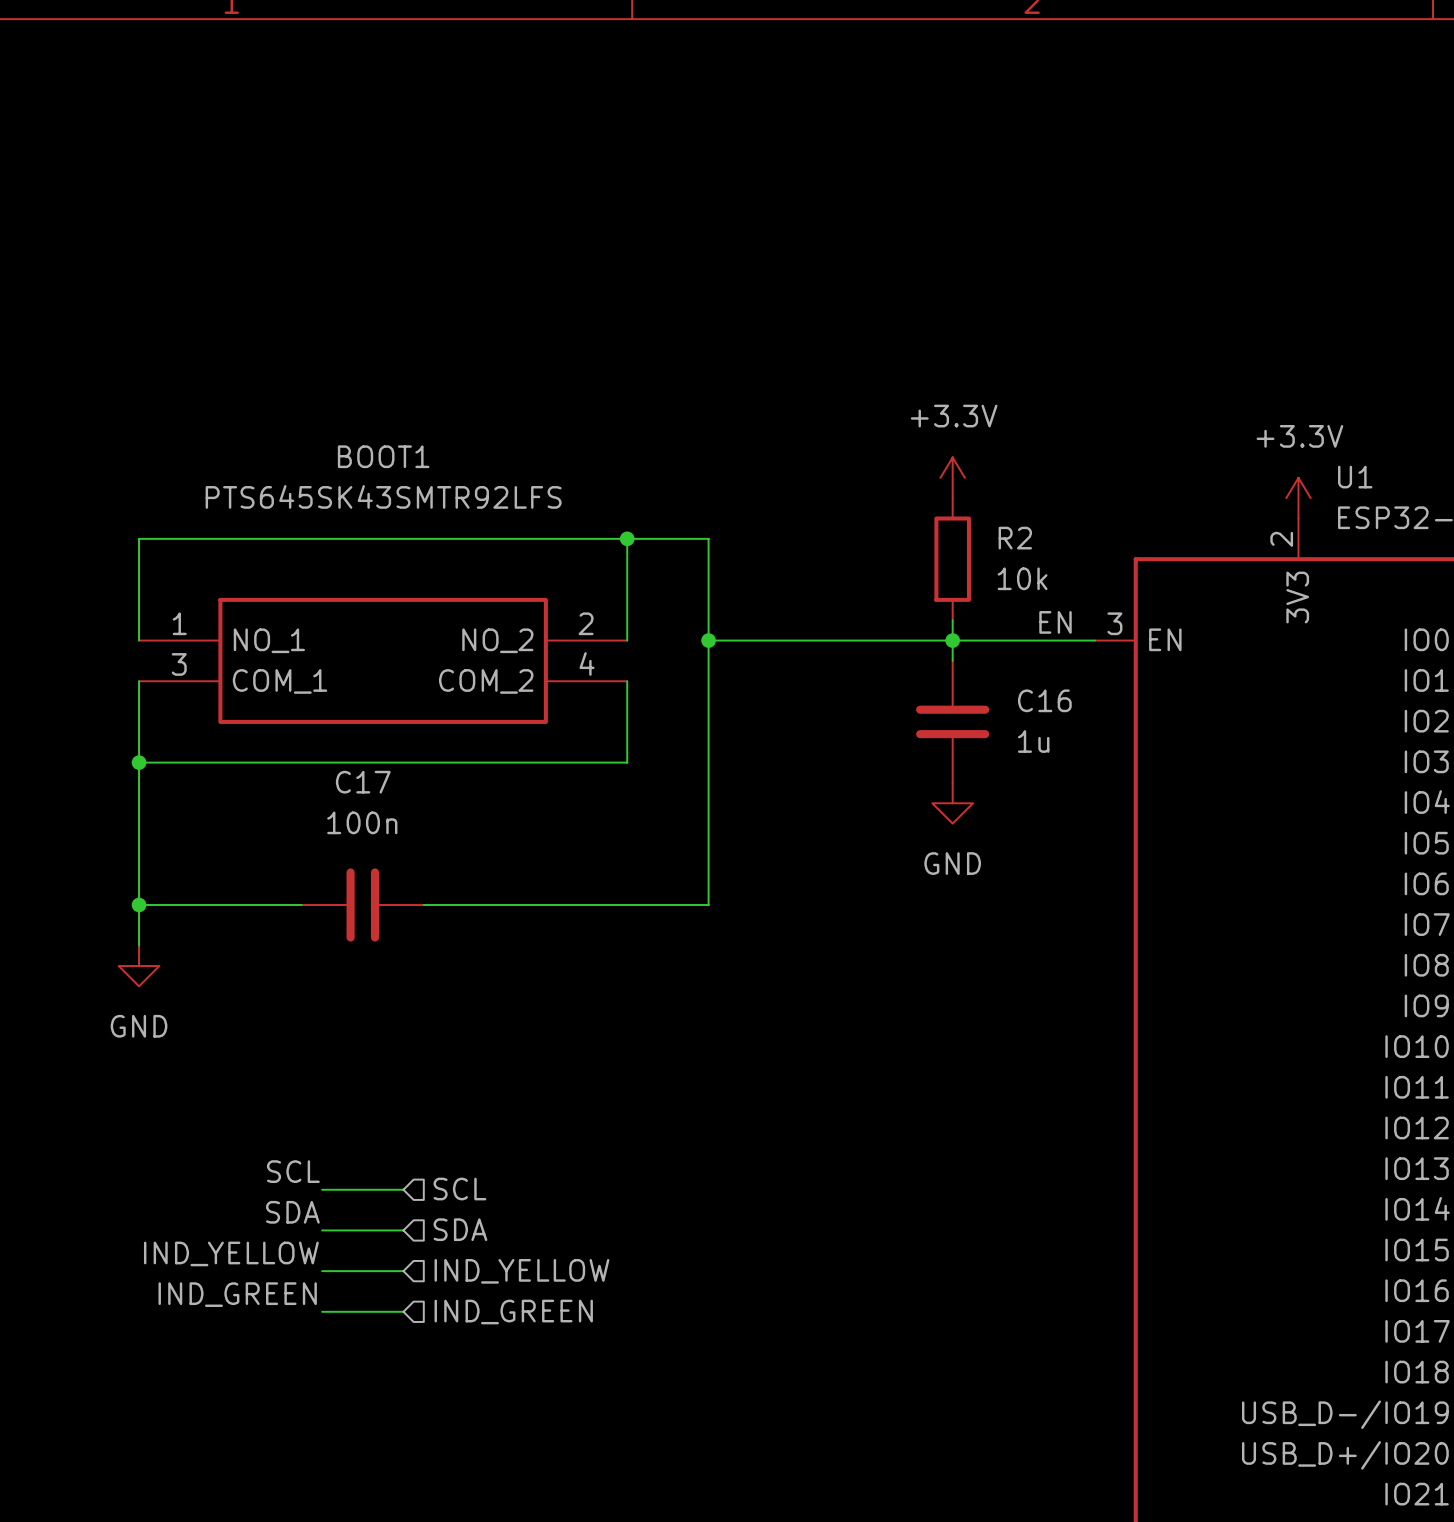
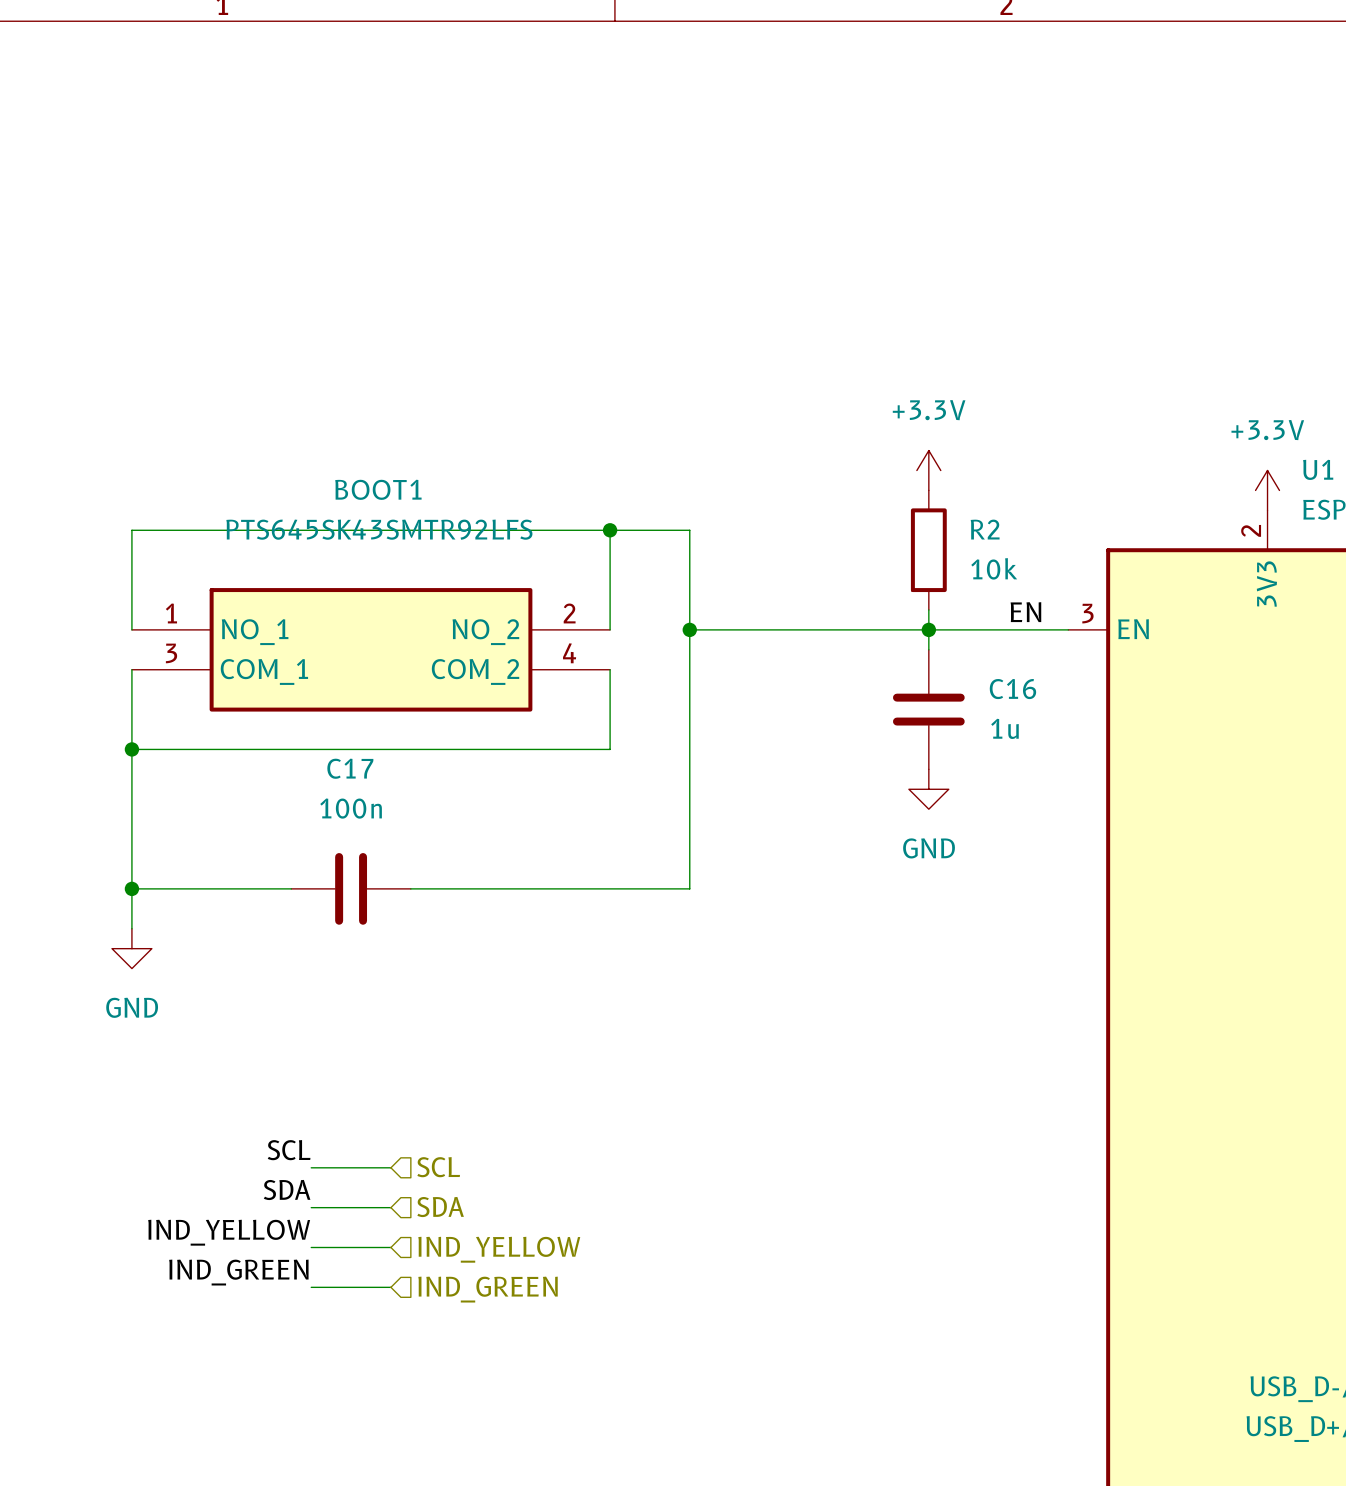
BOOT1 name position: BOOT1 (383, 456) -> BOOT1 (378, 489)
BOOT1 value position: PTS645SK43SMTR92LFS (383, 496) -> PTS645SK43SMTR92LFS (379, 529)

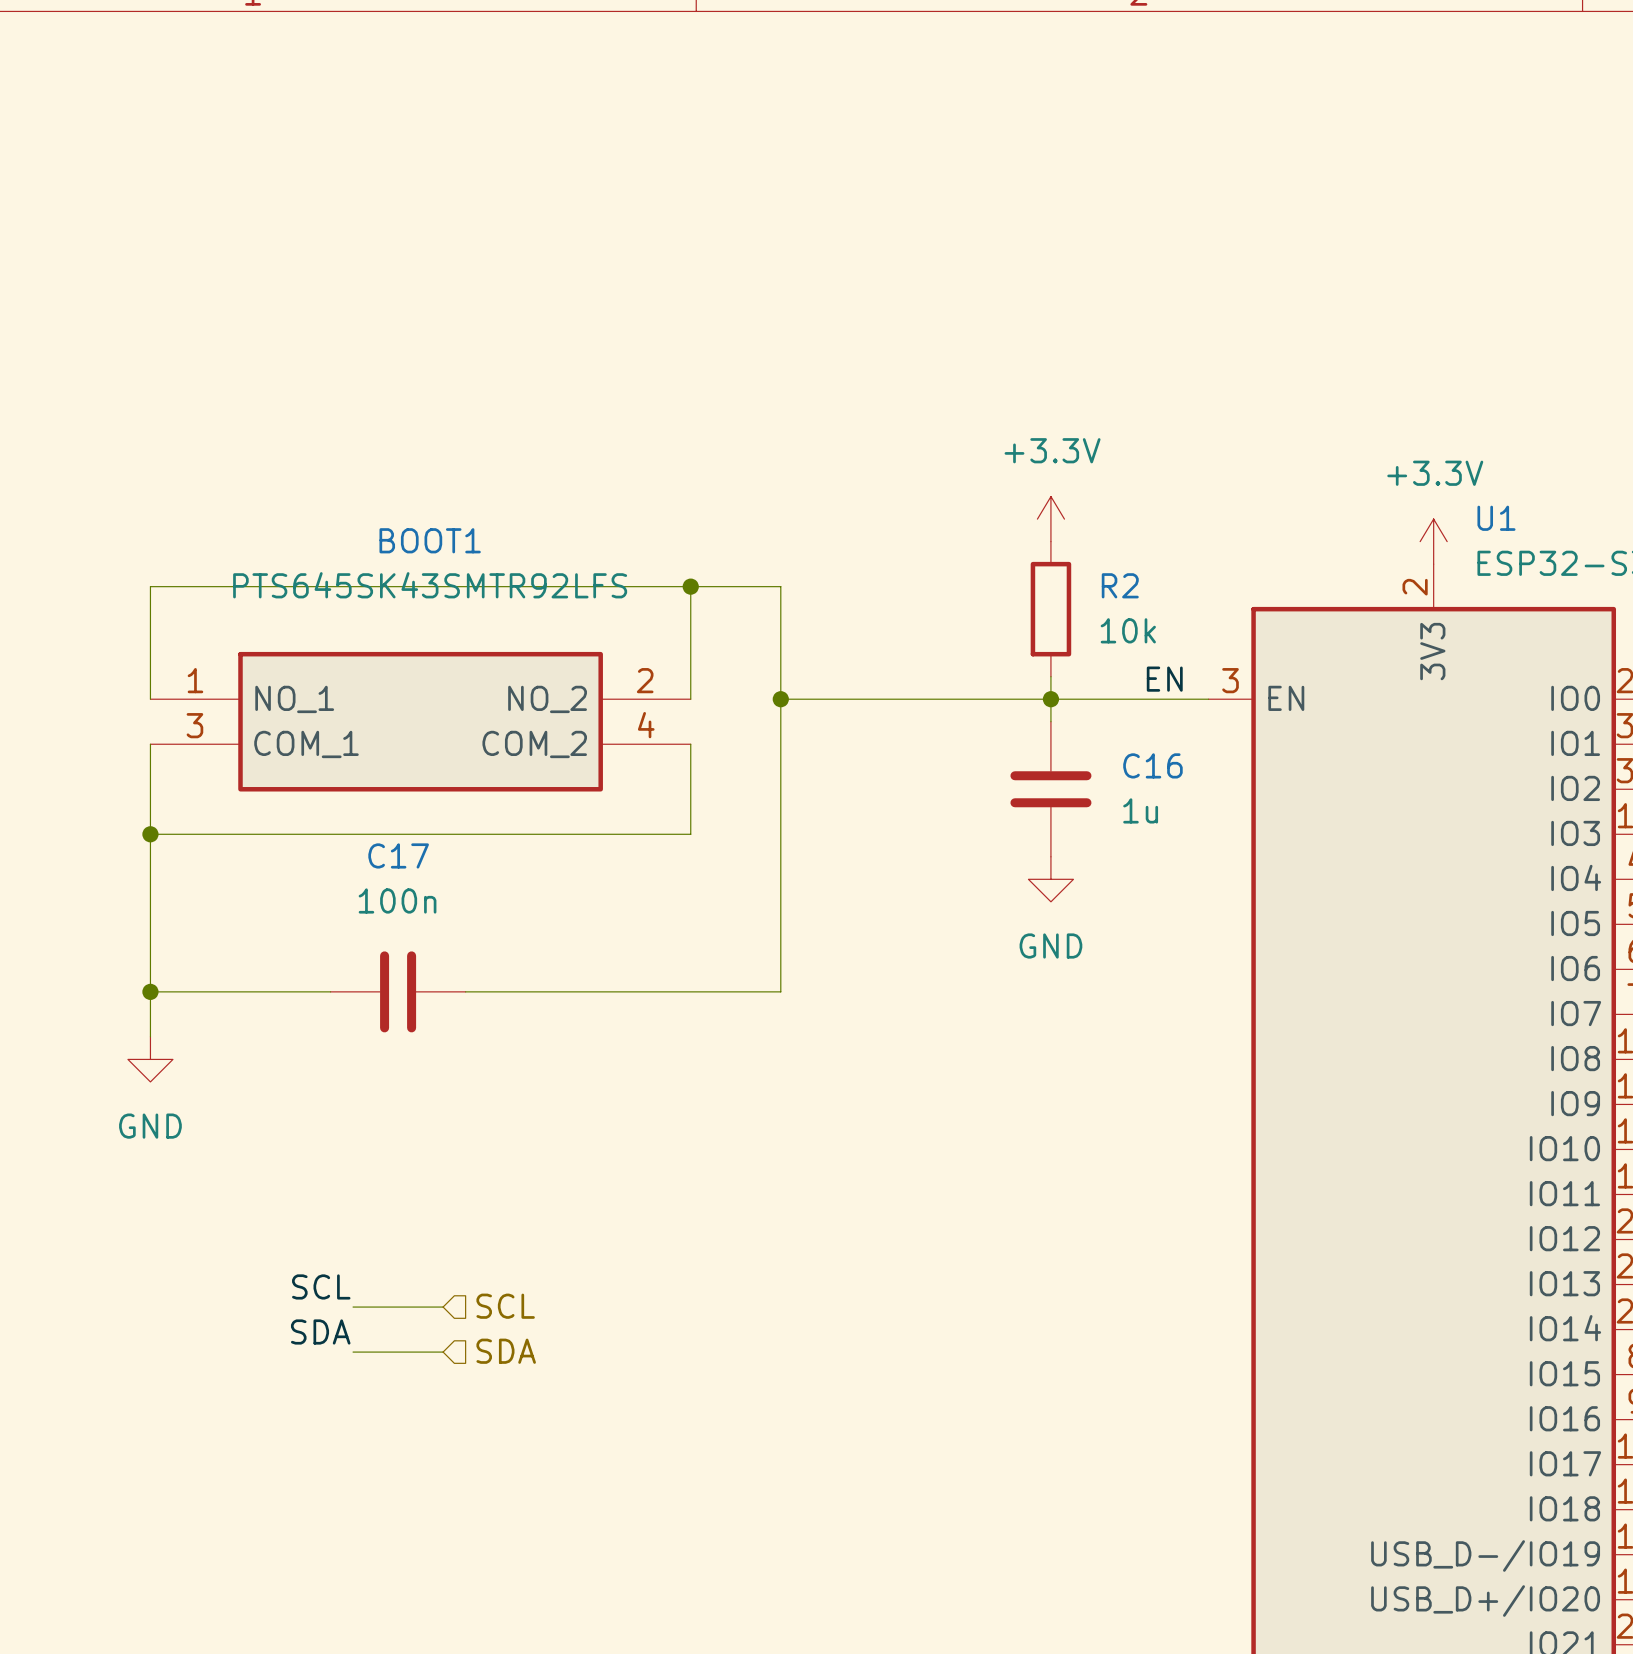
label: IND_YELLOW (229, 1232) -> none
wire: (311, 1247) (390, 1247) -> none
hierarchical label: IND_YELLOW (499, 1249) -> none
label: IND_GREEN (238, 1272) -> none
wire: (311, 1287) (390, 1287) -> none
hierarchical label: IND_GREEN (488, 1289) -> none

